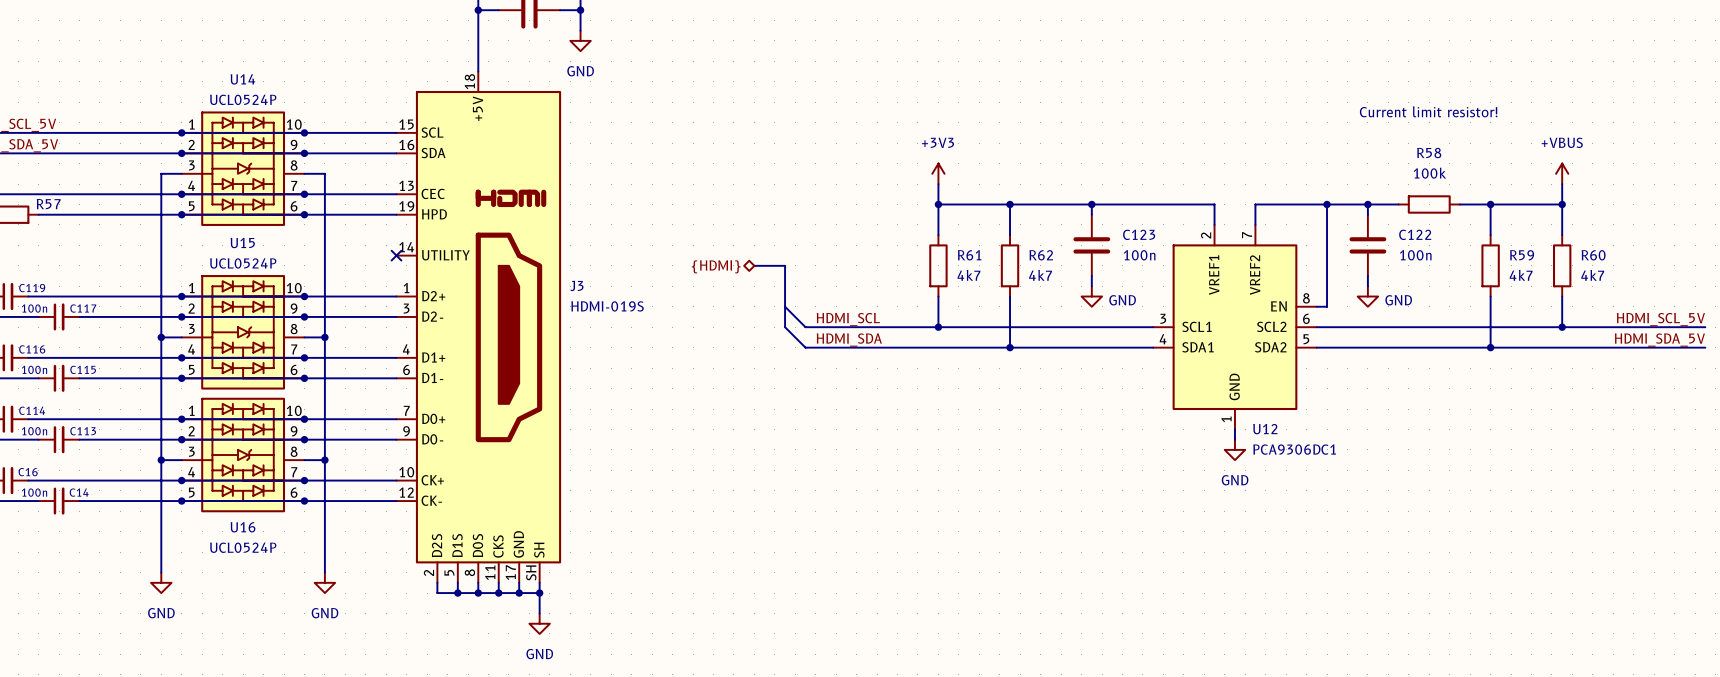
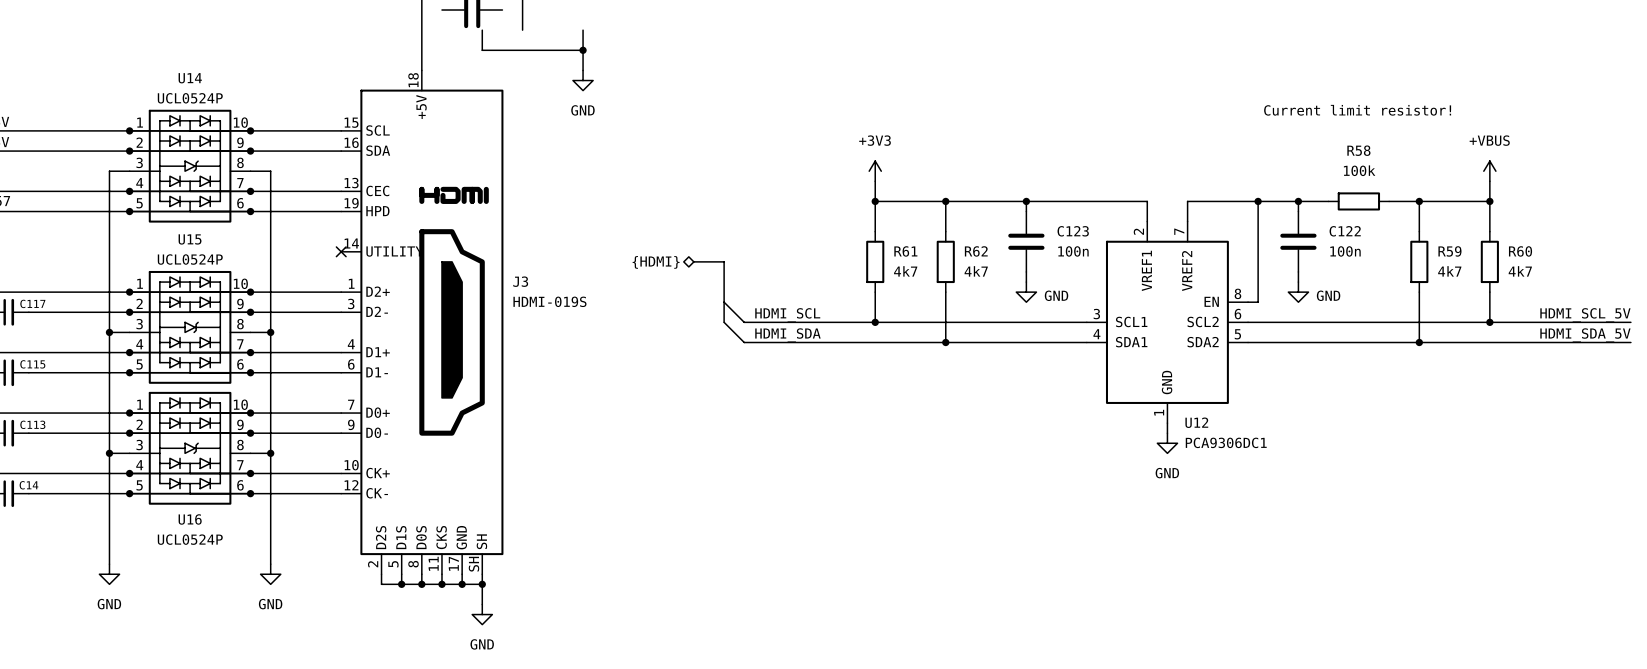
wire: (478, 10) (498, 10) -> none
junction: (478, 10) -> none
wire: (560, 10) (580, 10) -> none
junction: (580, 10) -> none
wire: none -> (482, 30) (482, 50) (583, 50)
wire: none -> (583, 30) (583, 70)
power symbol position: GND (580, 40) -> GND (583, 80)
junction: none -> (583, 50)

